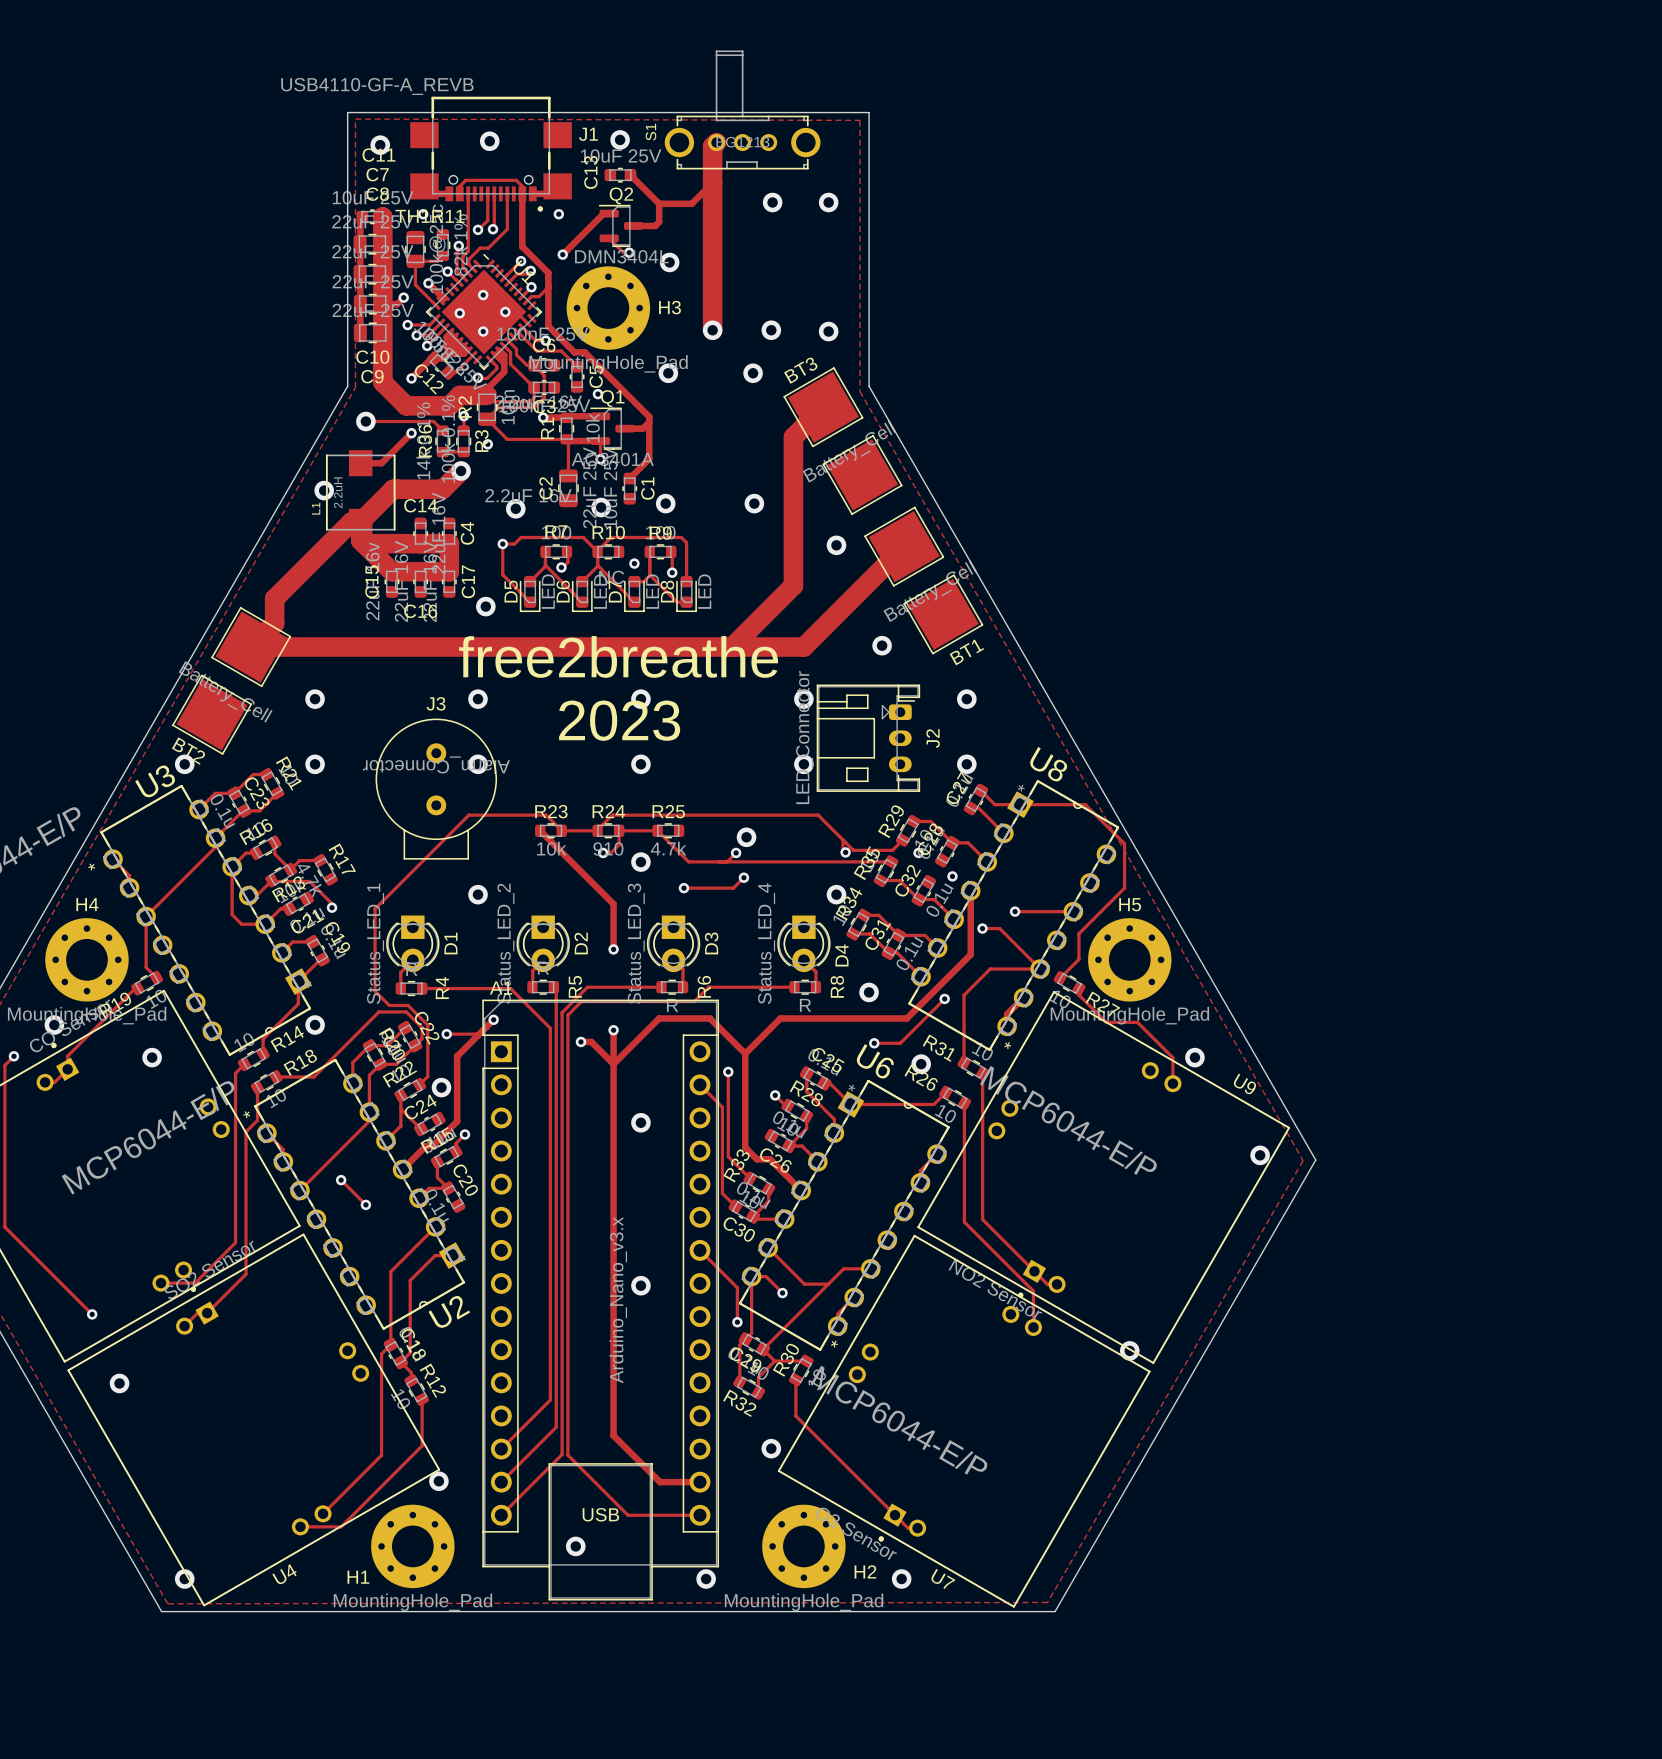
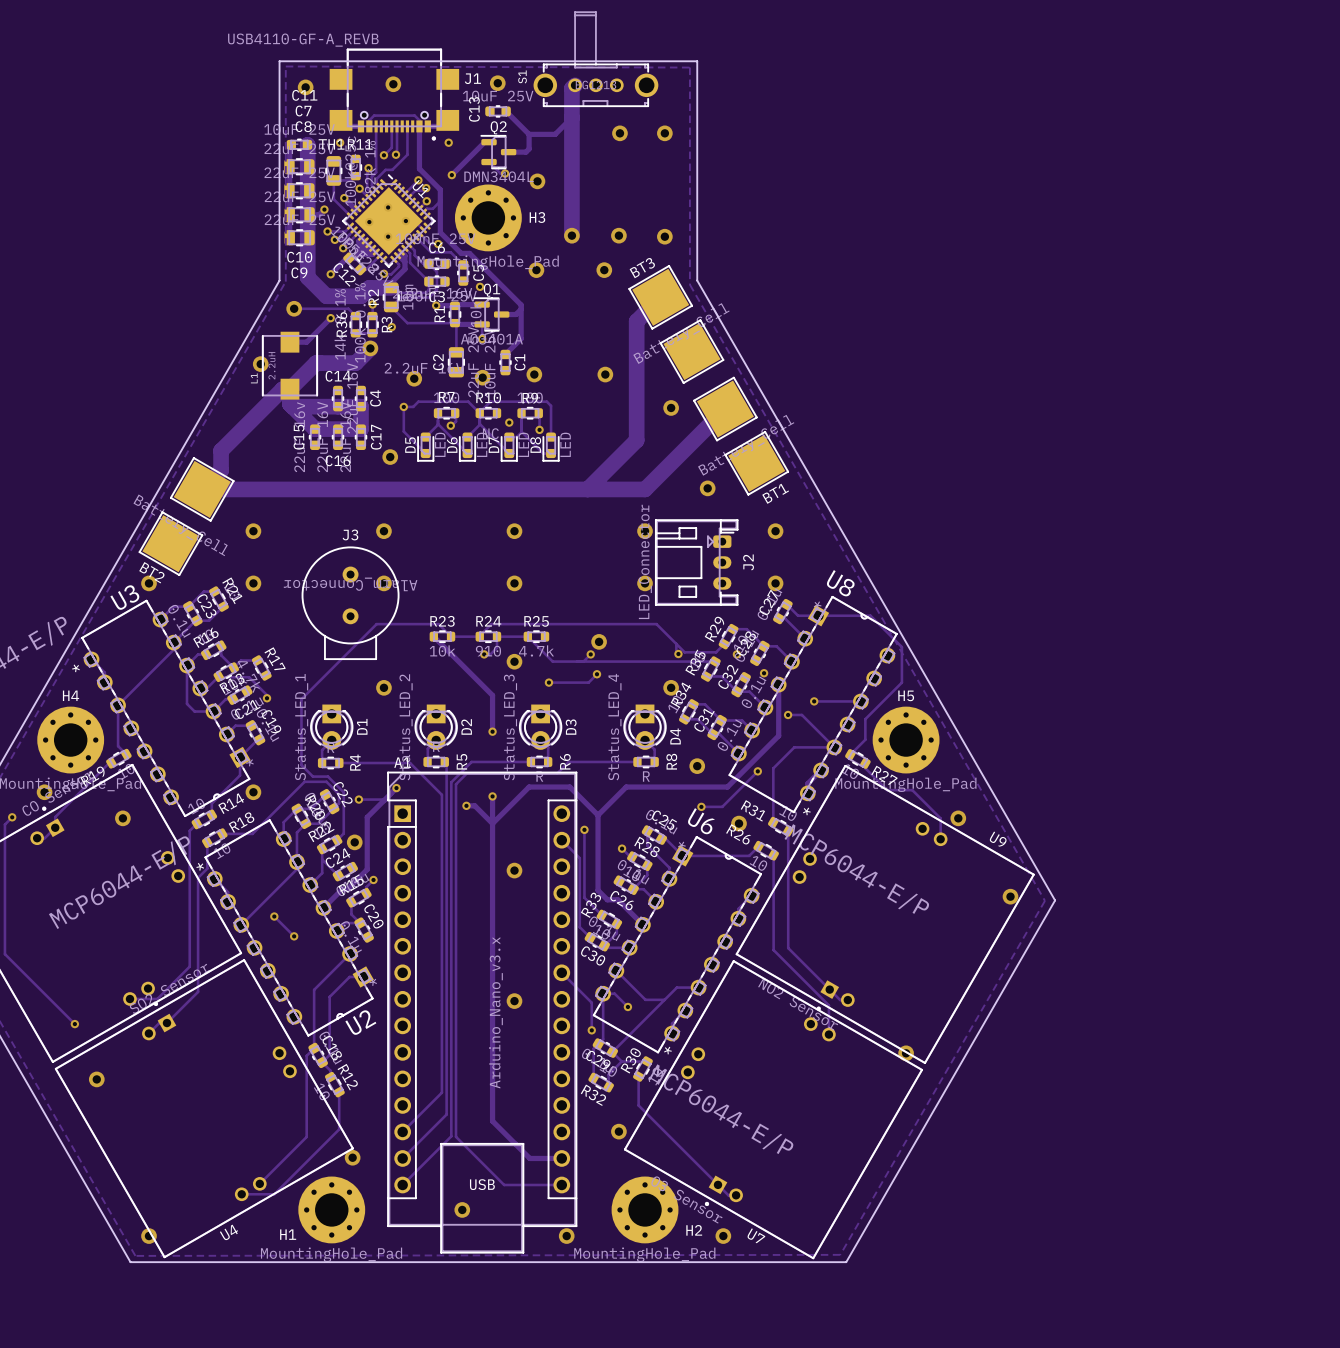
text: free2breathe (618, 656) -> none
text: 2023 (619, 720) -> none

